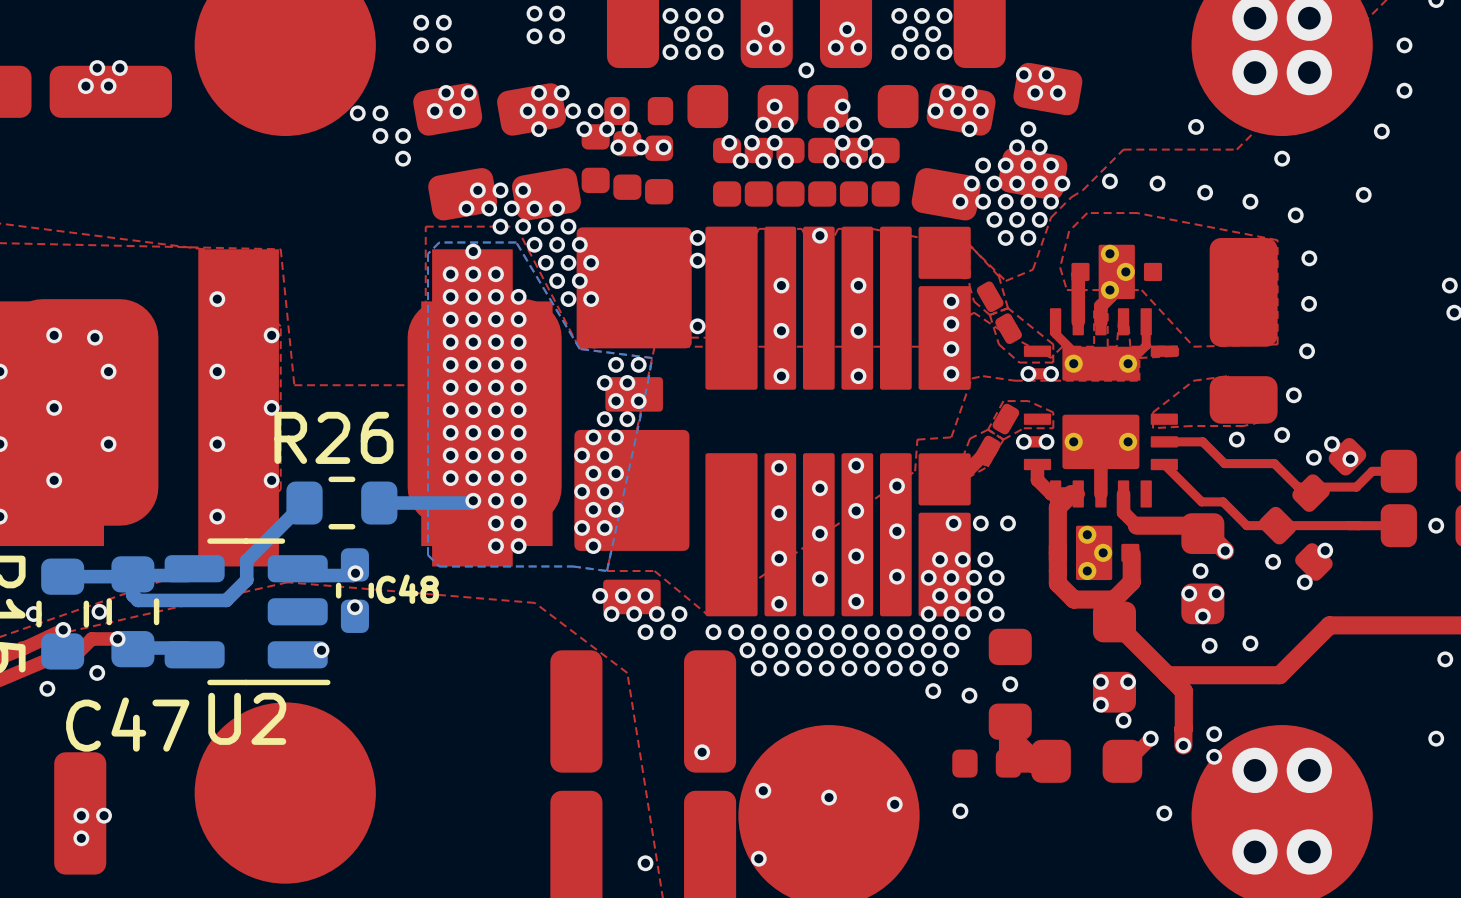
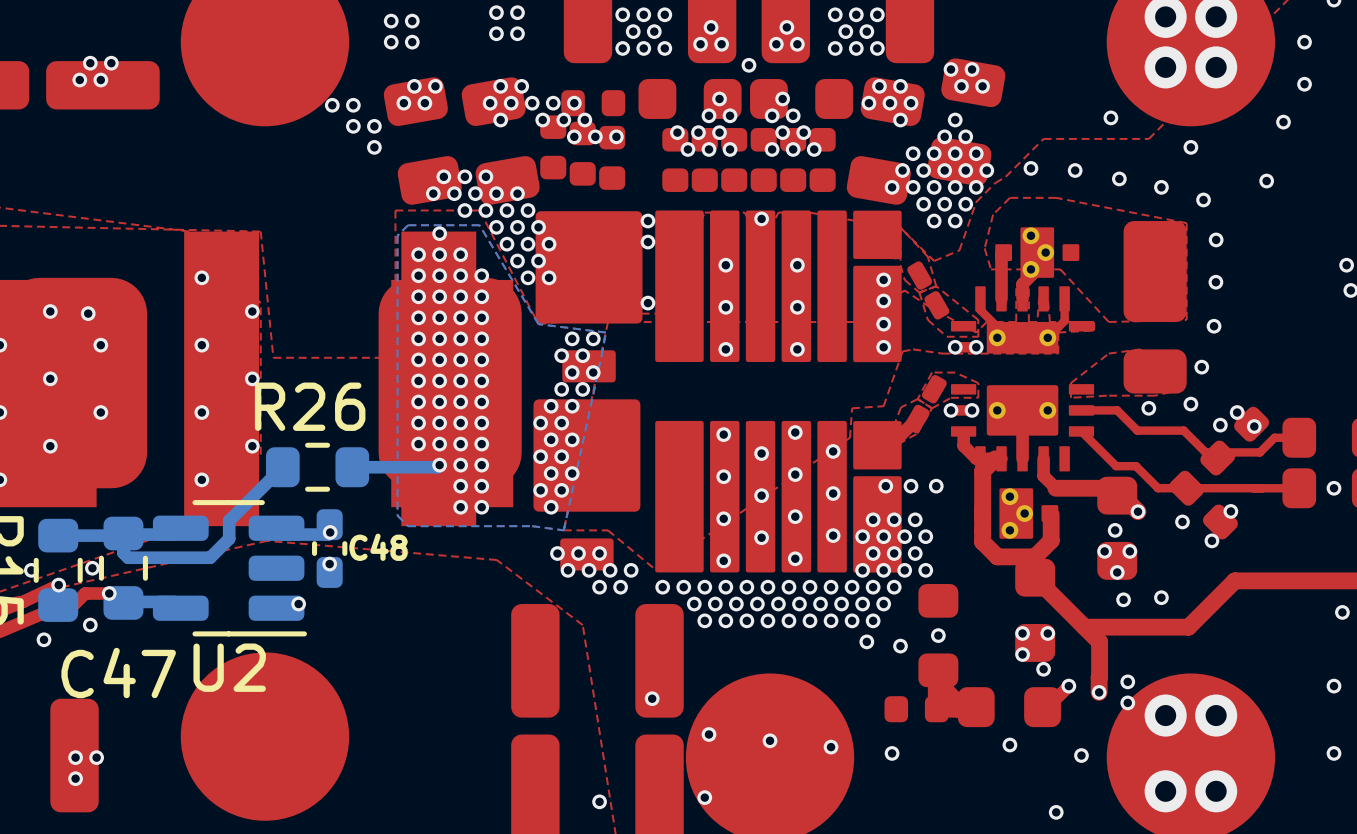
via: none -> (1009, 745)
via: none -> (1334, 753)
via: none -> (1056, 812)

